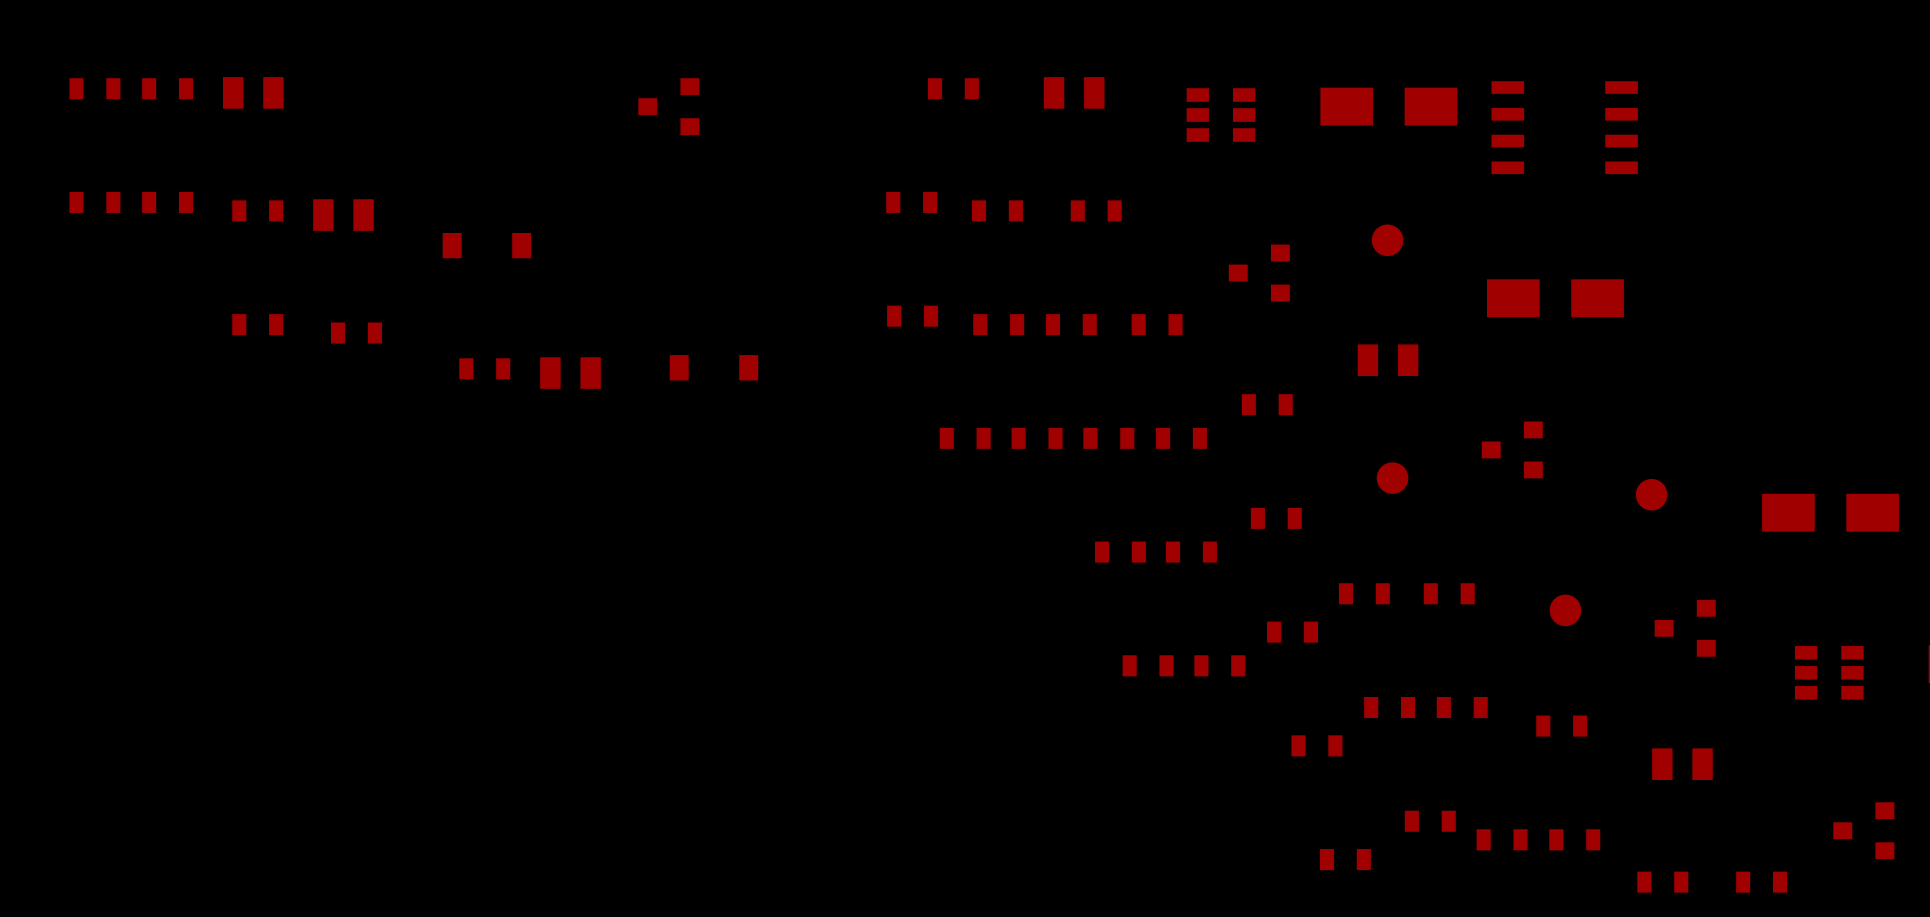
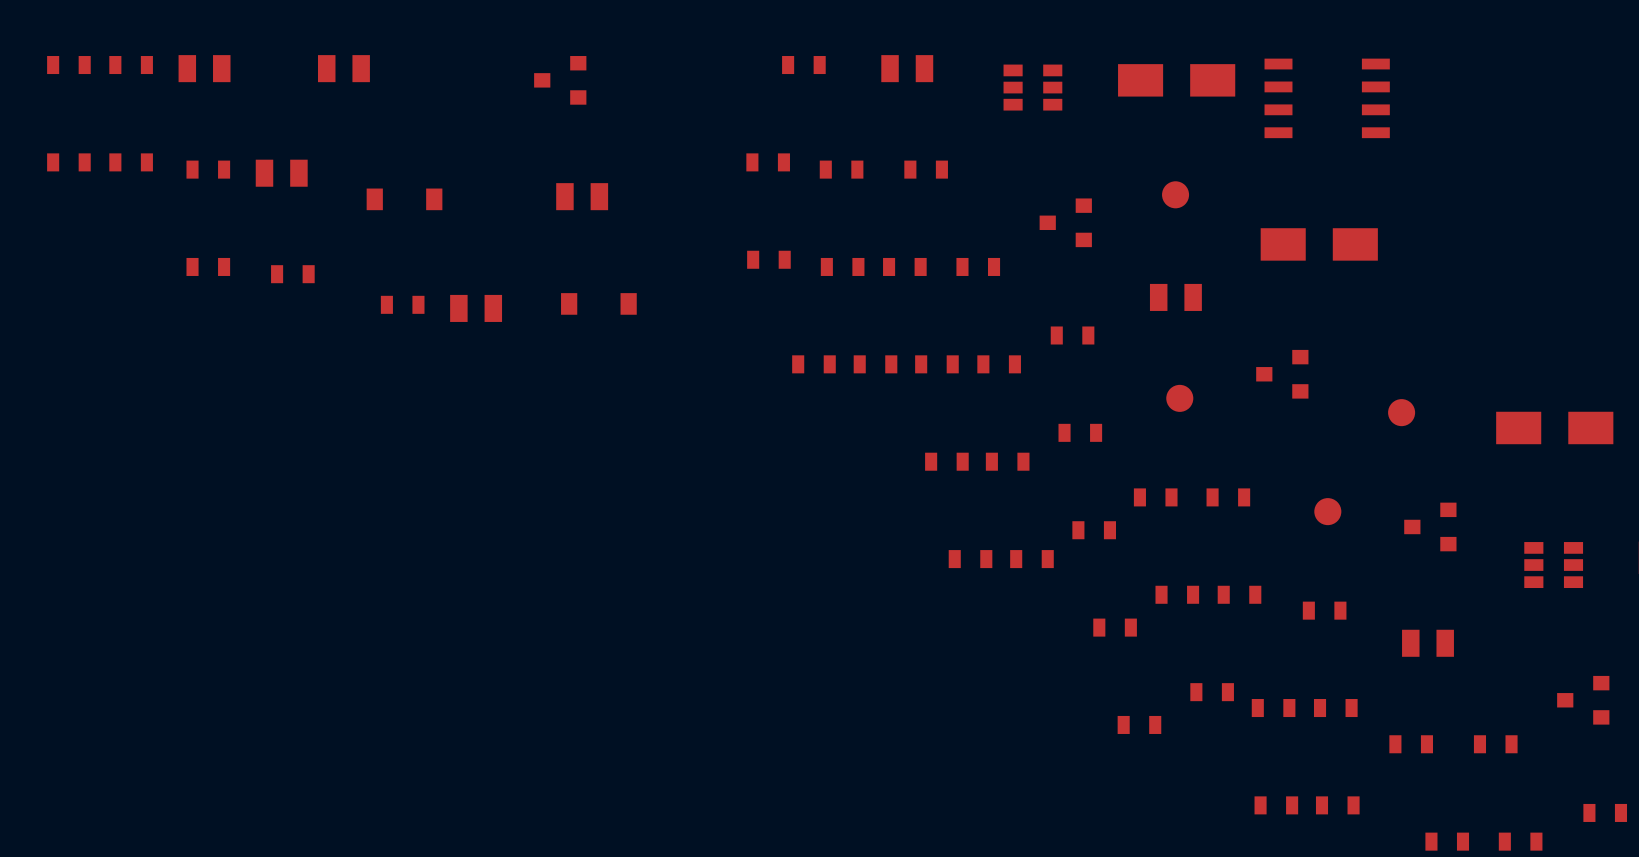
part: none -> (343, 68)
part: none -> (582, 196)

